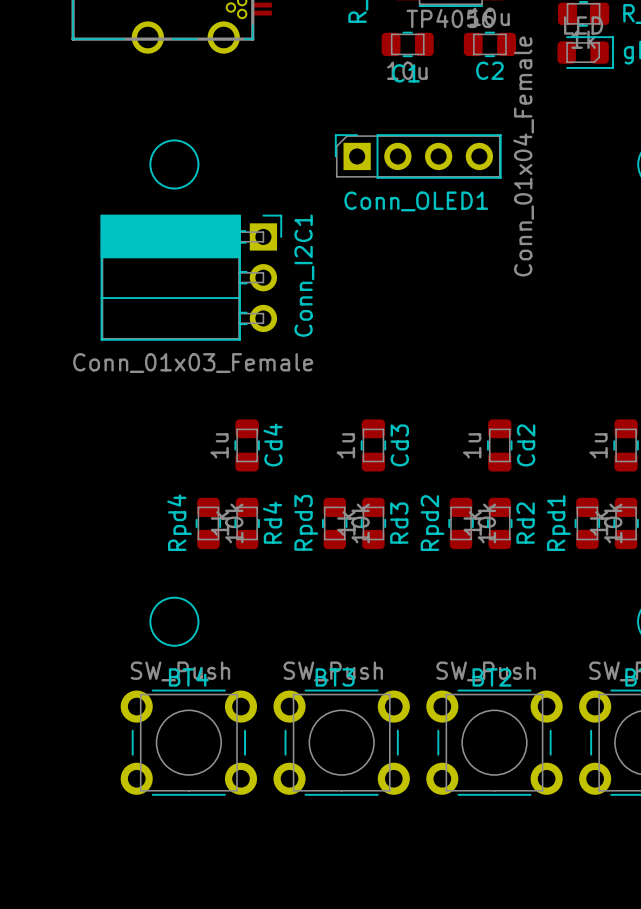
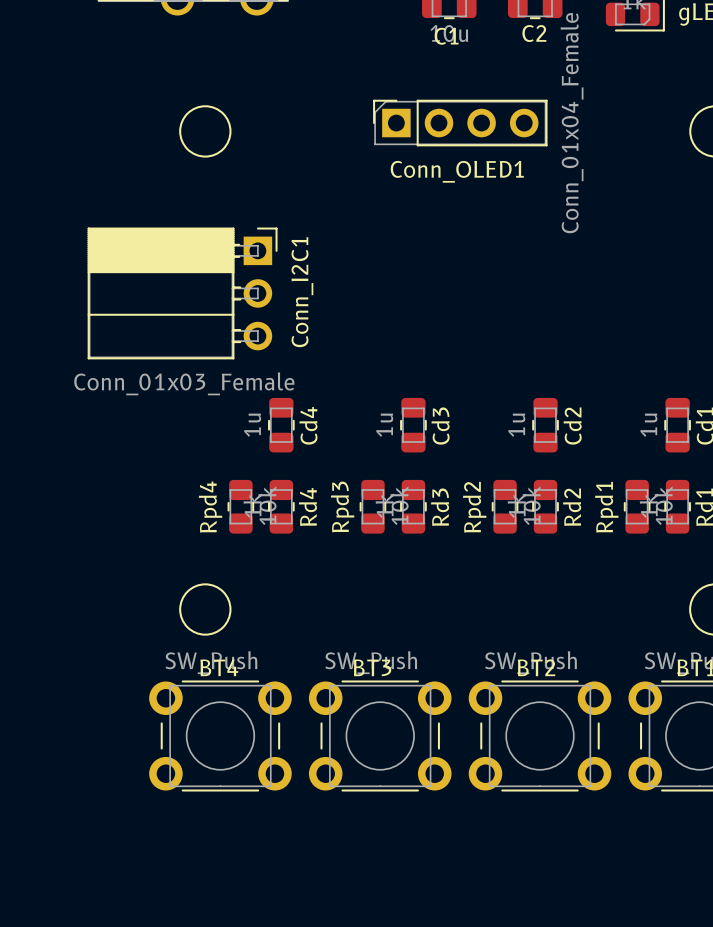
Conn_I2C1 footprint: [100, 214, 283, 341] -> [87, 227, 278, 360]

